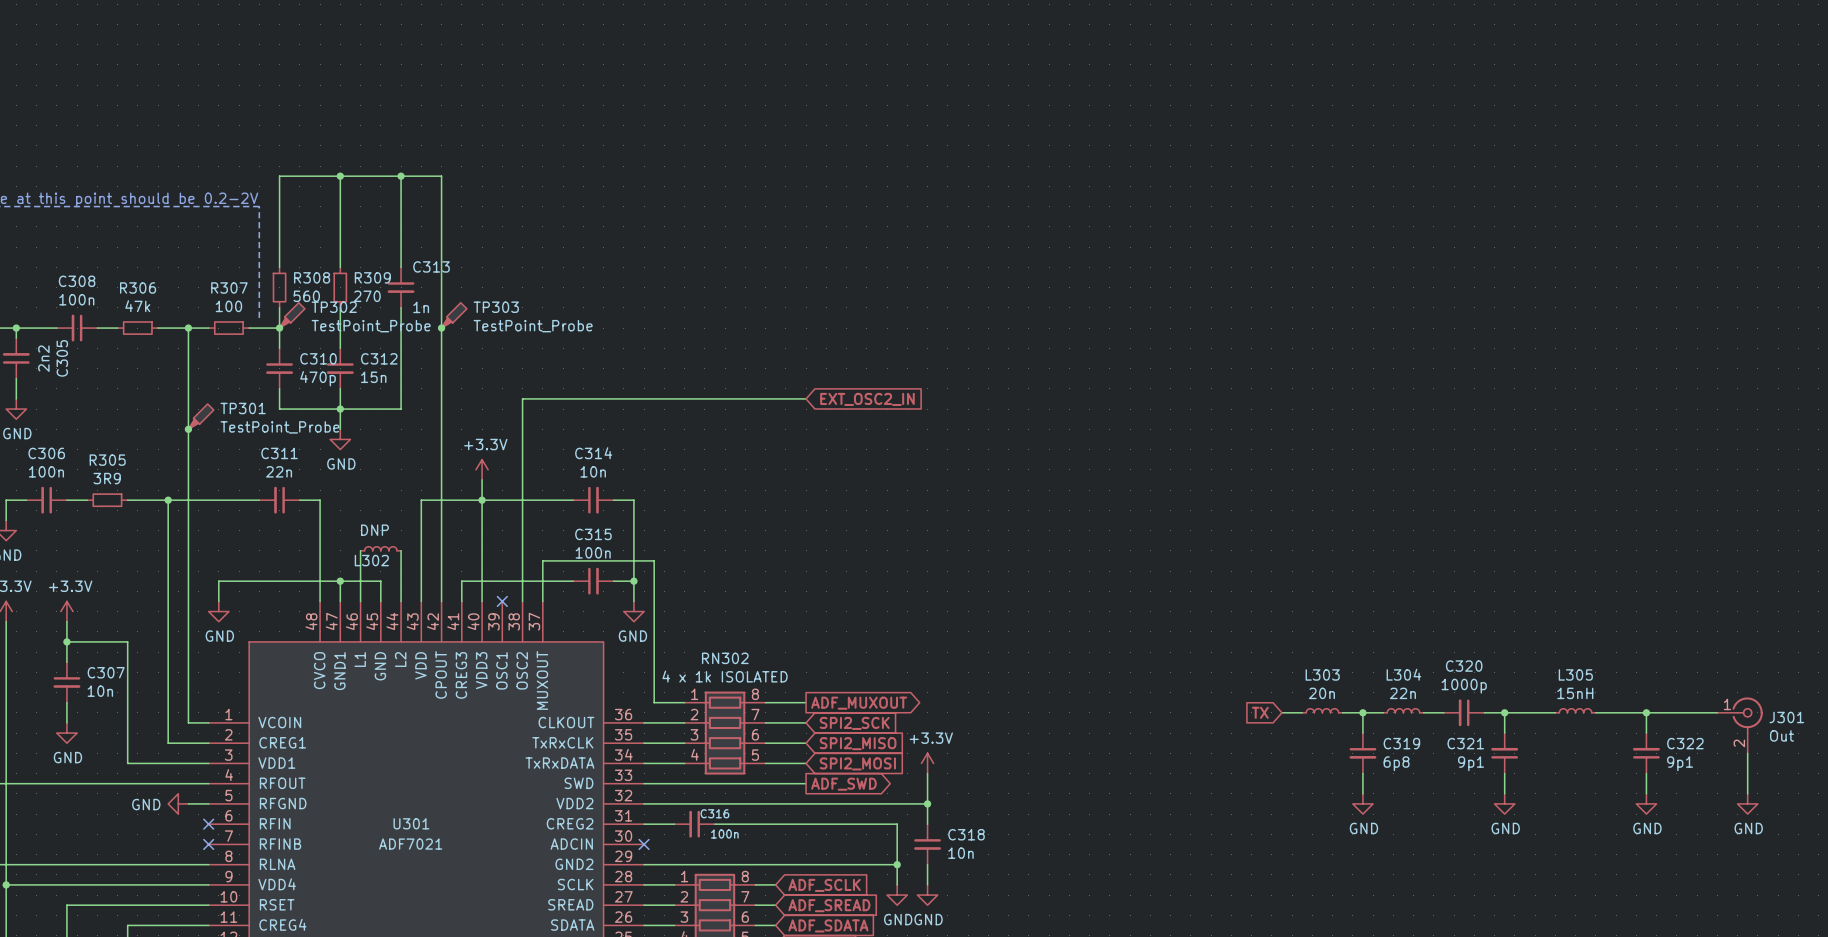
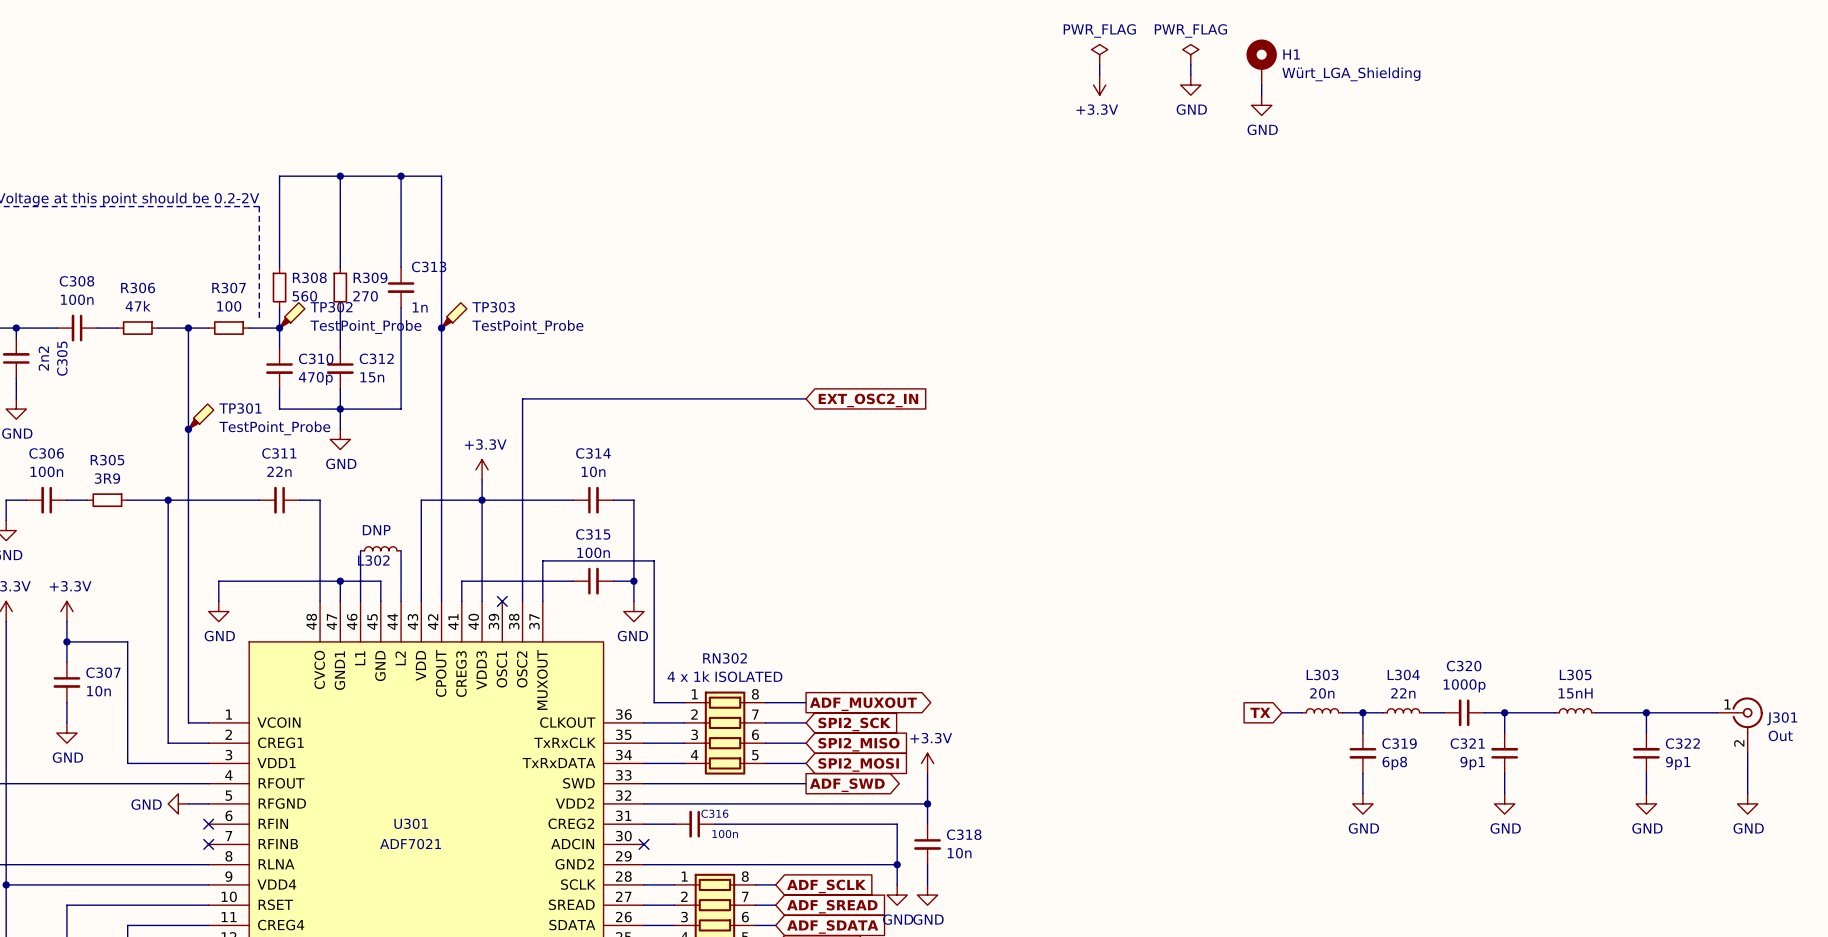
power symbol: none -> PWR_FLAG (1099, 54)
power symbol: none -> PWR_FLAG (1190, 54)
H1: none -> Würt_LGA_Shielding (1261, 62)
wire: none -> (1099, 64) (1099, 74)
wire: none -> (1190, 64) (1190, 74)
power symbol: none -> +3.3V (1099, 85)
power symbol: none -> GND (1190, 85)
wire: none -> (1261, 85) (1261, 95)
power symbol: none -> GND (1261, 105)

